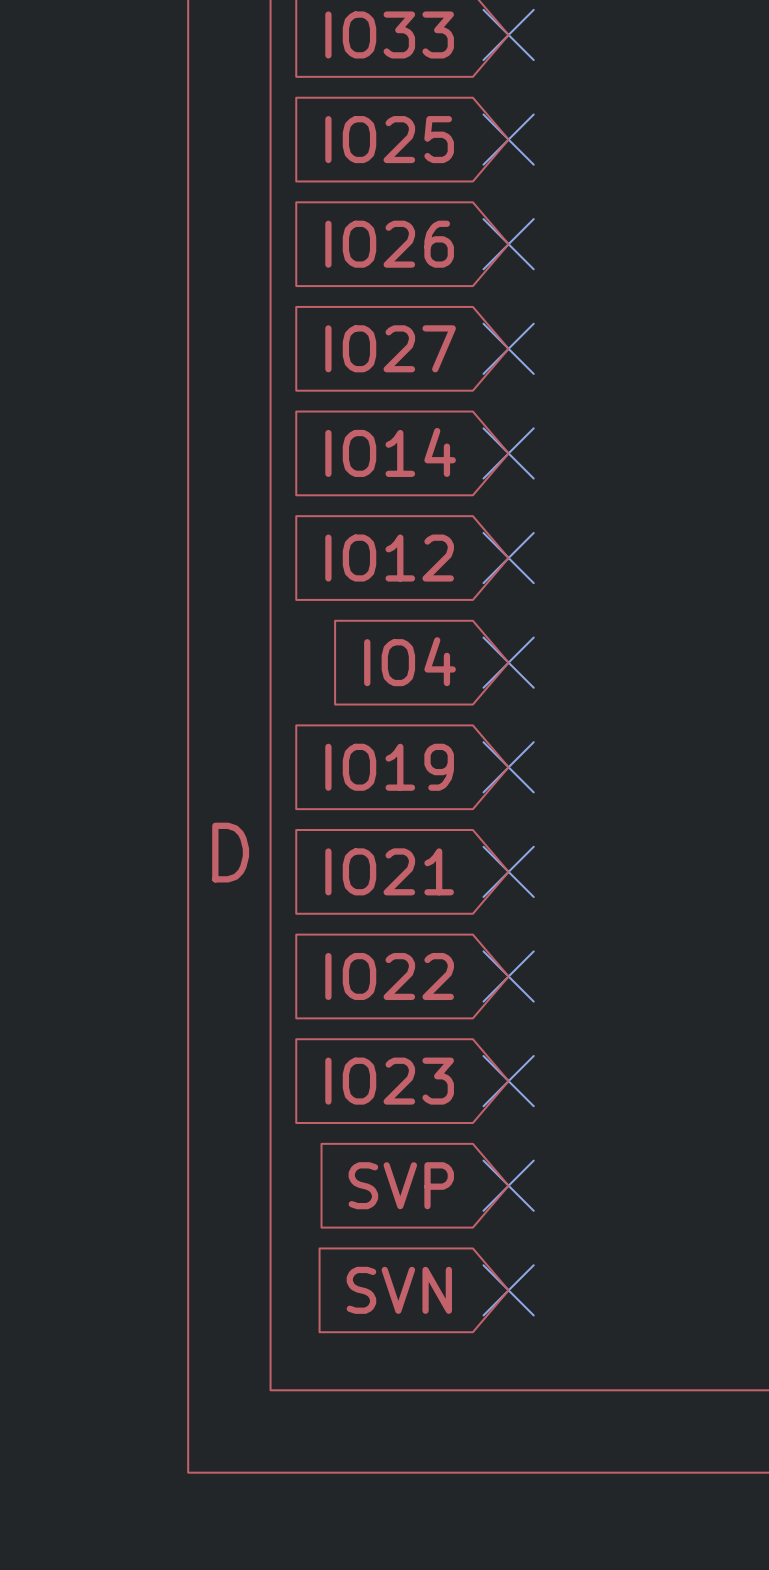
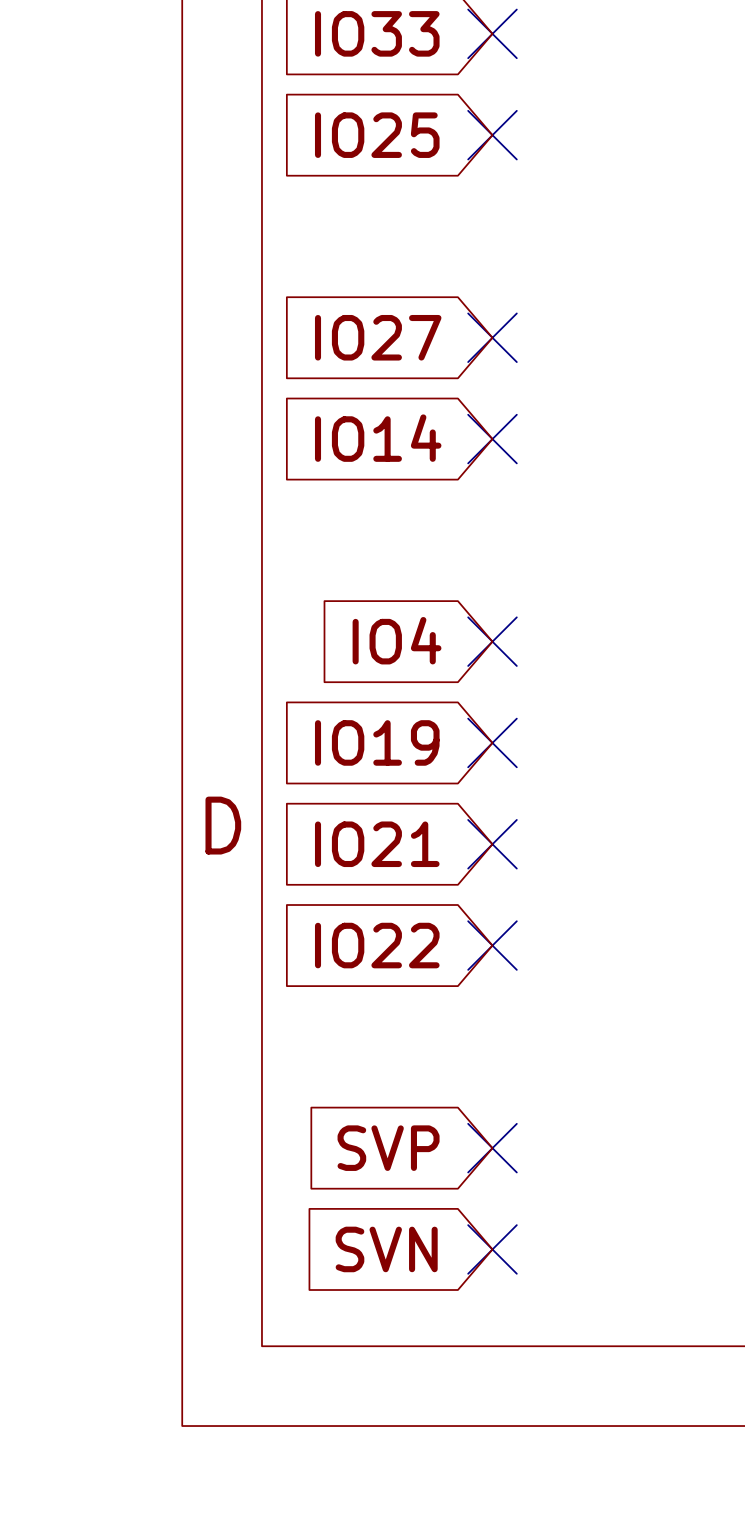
global label: IO26 (389, 244) -> none
no-connect mark: (508, 244) -> none
global label: IO12 (389, 558) -> none
no-connect mark: (508, 558) -> none
global label: IO23 (389, 1081) -> none
no-connect mark: (508, 1081) -> none

